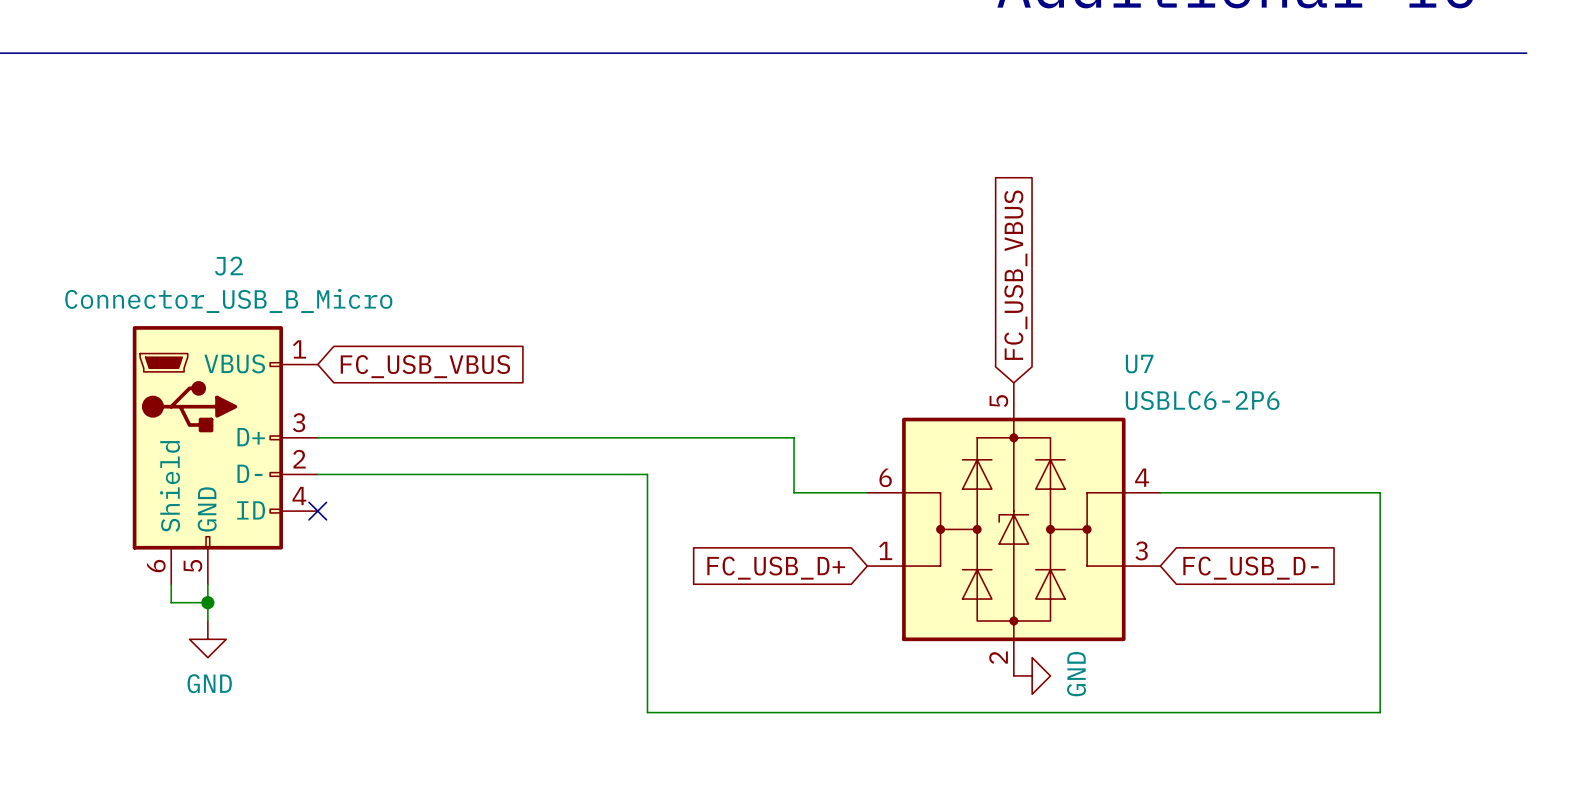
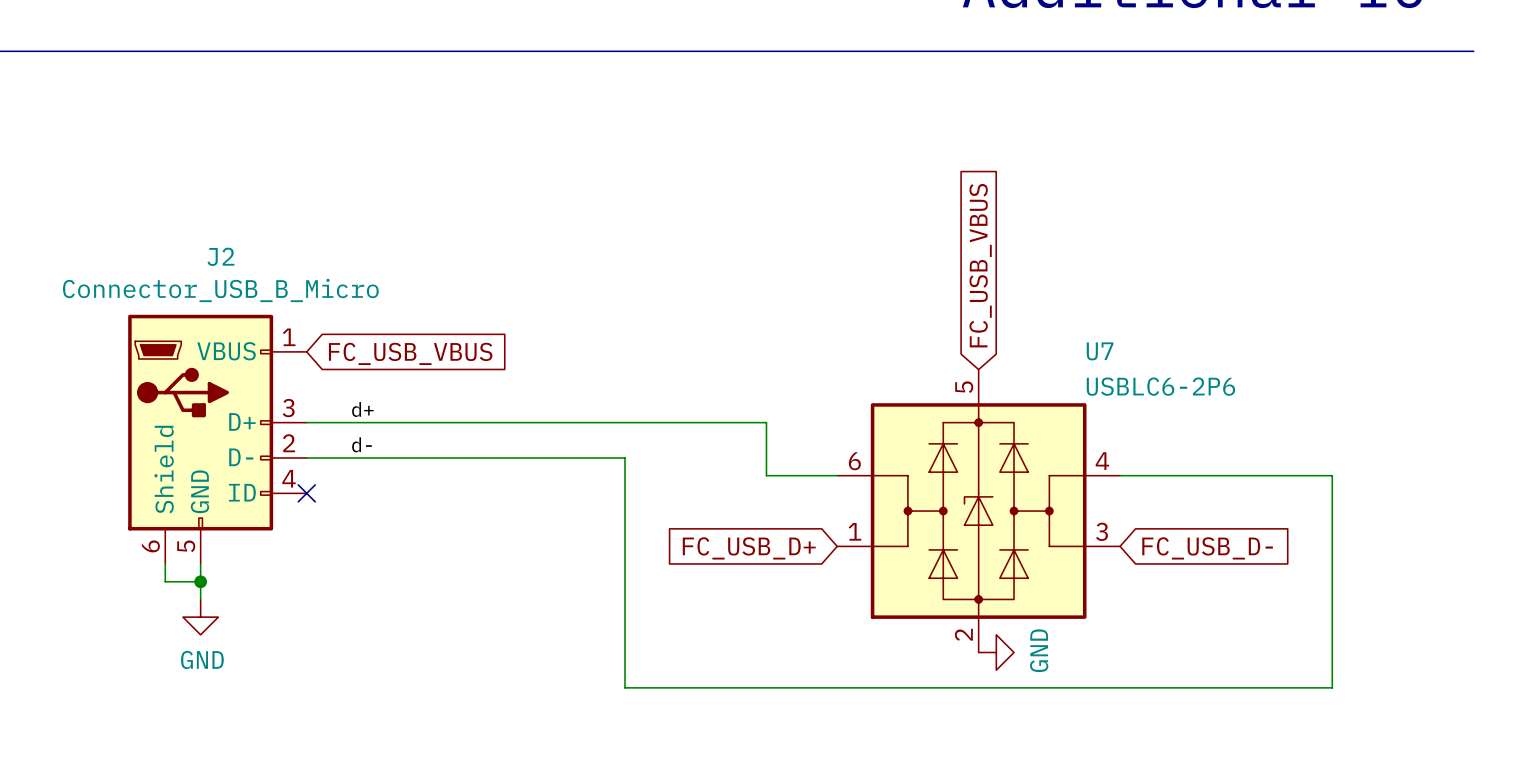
label: none -> d+ (362, 409)
label: none -> d- (361, 444)

